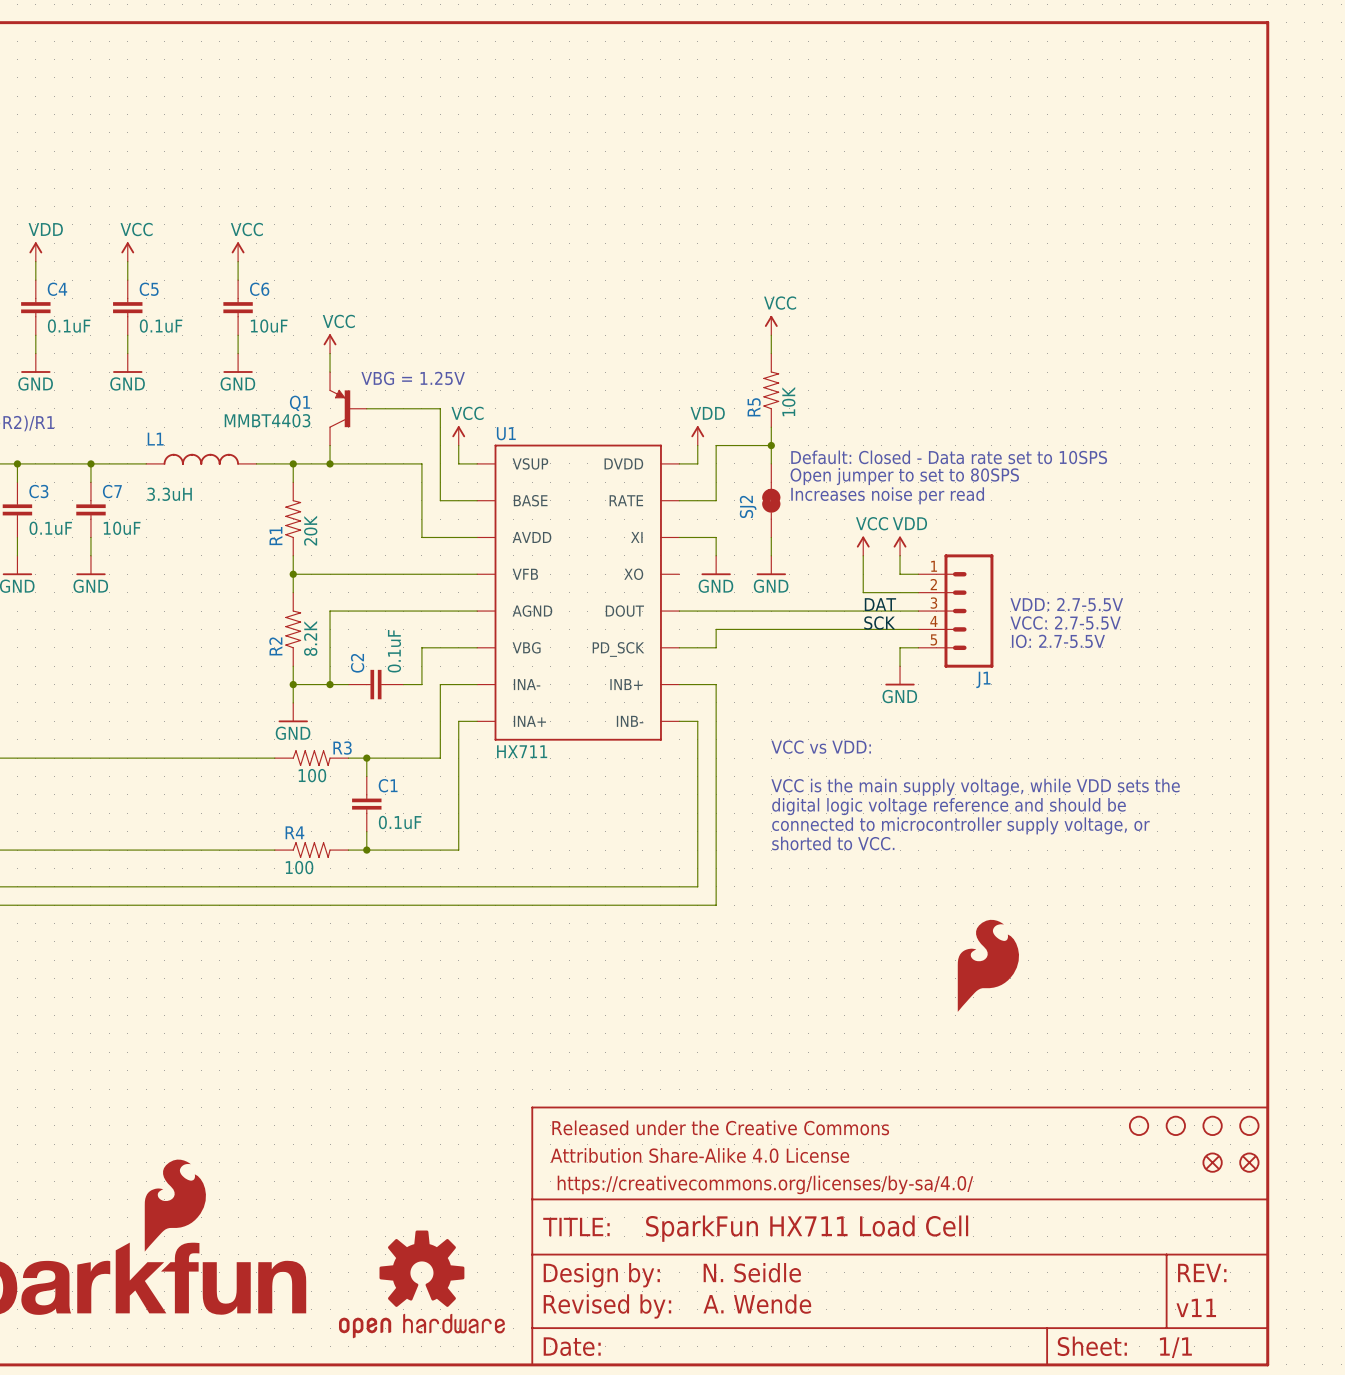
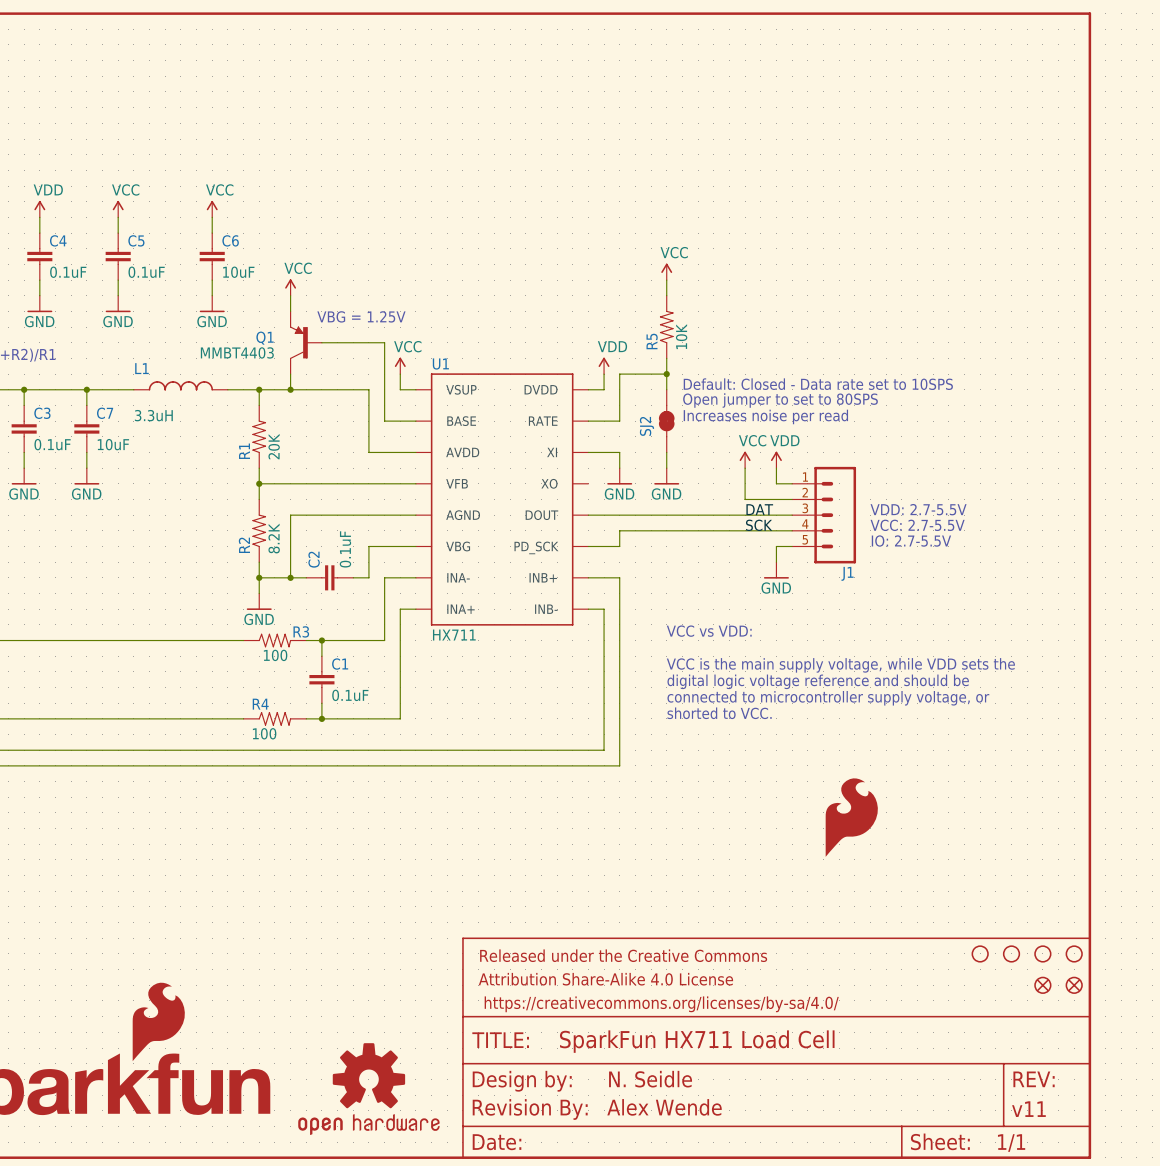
text: A. Wende (757, 1304) -> Alex Wende (664, 1107)
text: Revised by: (607, 1306) -> none
part: none -> (530, 1109)

